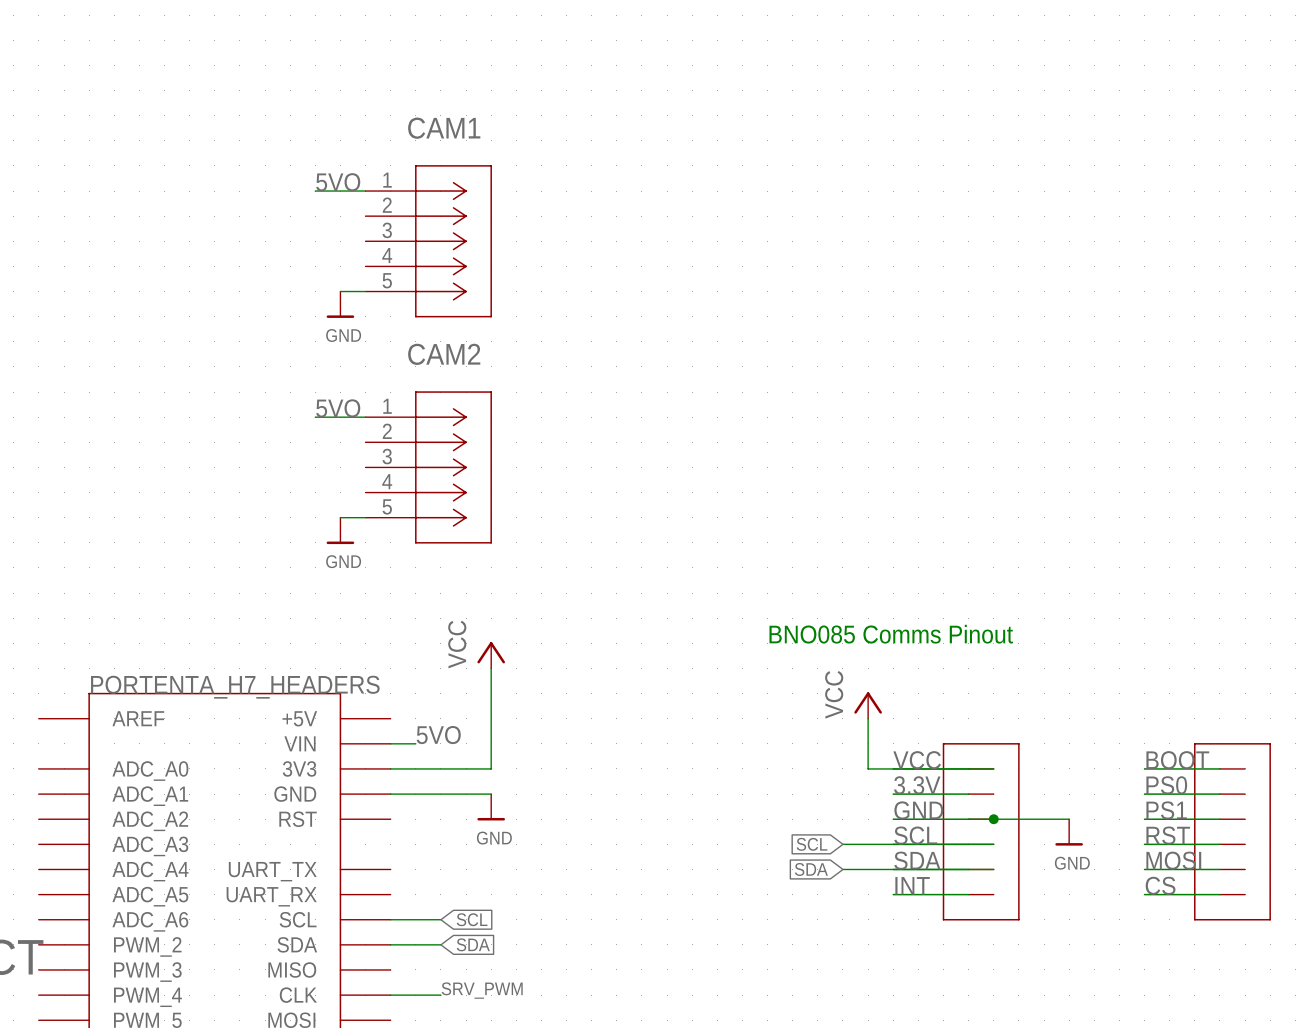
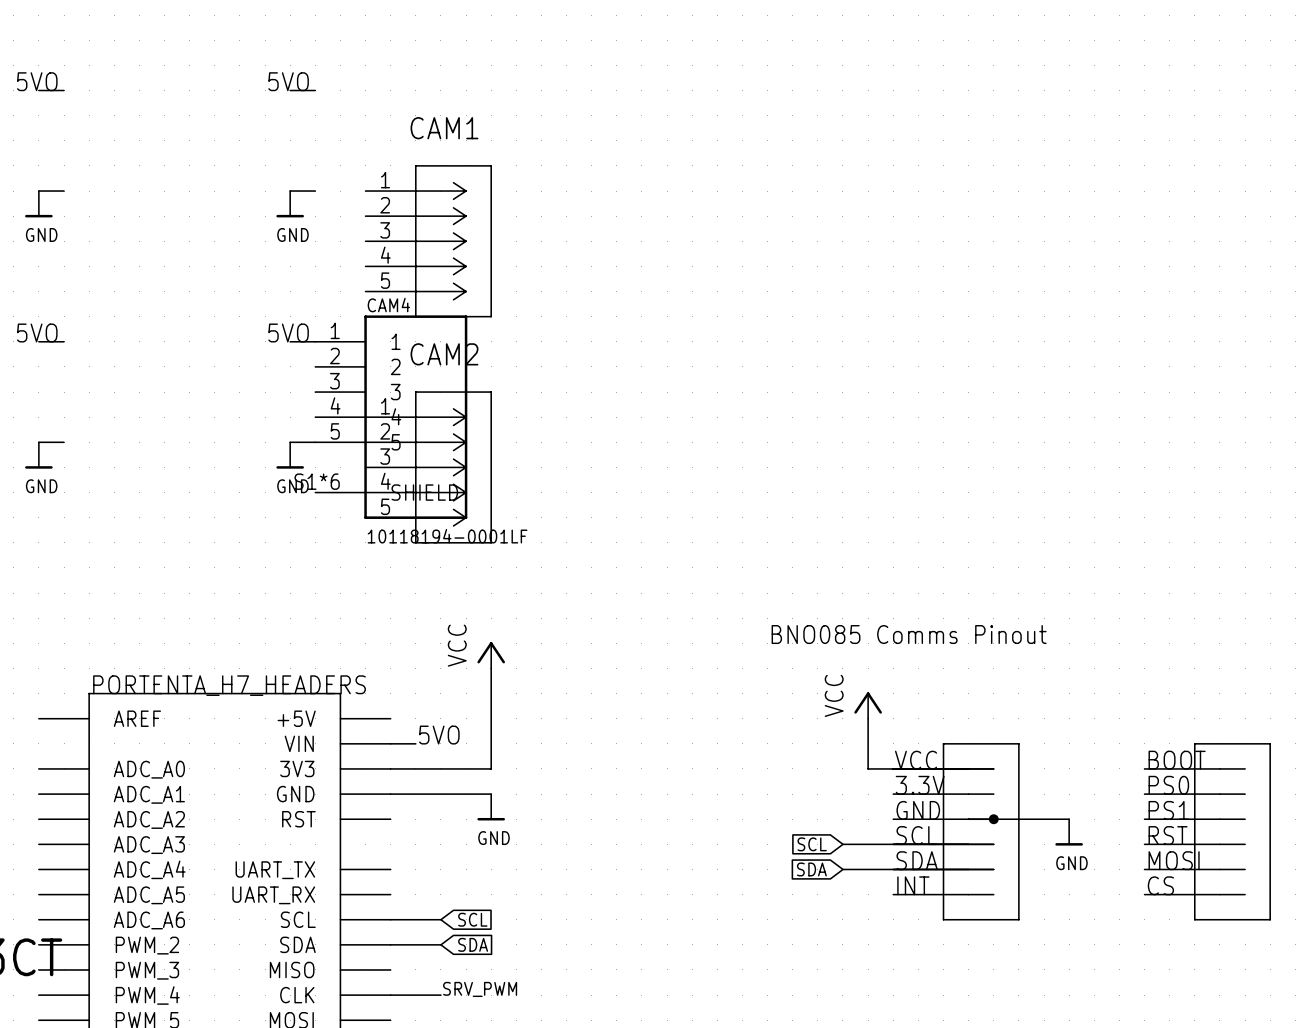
label: none -> 5VO (37, 81)
label: none -> 5VO (288, 81)
wire: none -> (38, 90) (64, 90)
wire: none -> (290, 90) (315, 90)
label: 5VO (338, 182) -> none
wire: none -> (38, 191) (64, 191)
wire: (315, 191) (365, 191) -> (315, 191) (290, 191)
power symbol: none -> GND (38, 204)
power symbol: none -> GND (290, 204)
wire: (340, 291) (365, 291) -> (290, 341) (315, 341)
power symbol: GND (340, 304) -> none
label: none -> 5VO (37, 332)
label: none -> 5VO (288, 332)
wire: none -> (38, 341) (64, 341)
label: 5VO (338, 408) -> none
CAM4: none -> 10118194-0001LF (391, 417)
wire: none -> (38, 442) (64, 442)
power symbol: none -> GND (38, 455)
power symbol: none -> GND (290, 455)
wire: (340, 517) (365, 517) -> (290, 442) (315, 442)
power symbol: GND (340, 530) -> none

